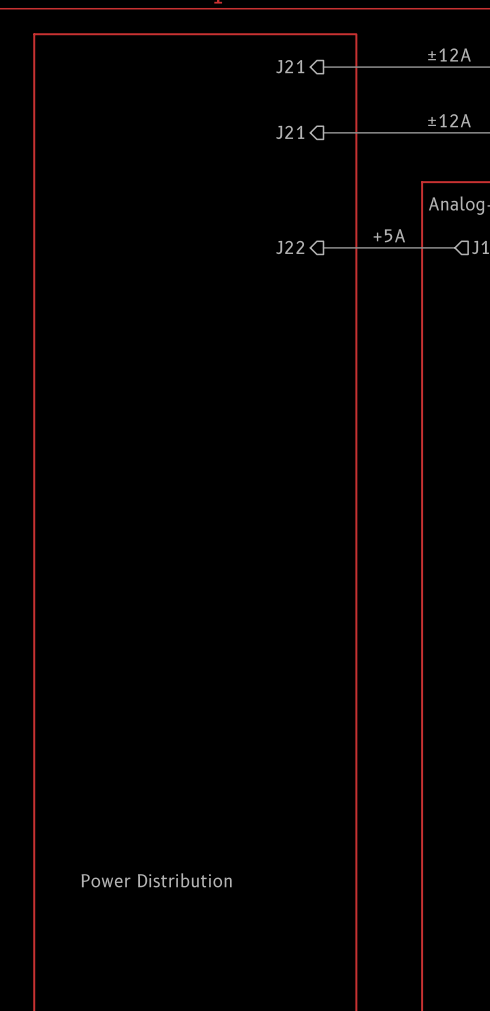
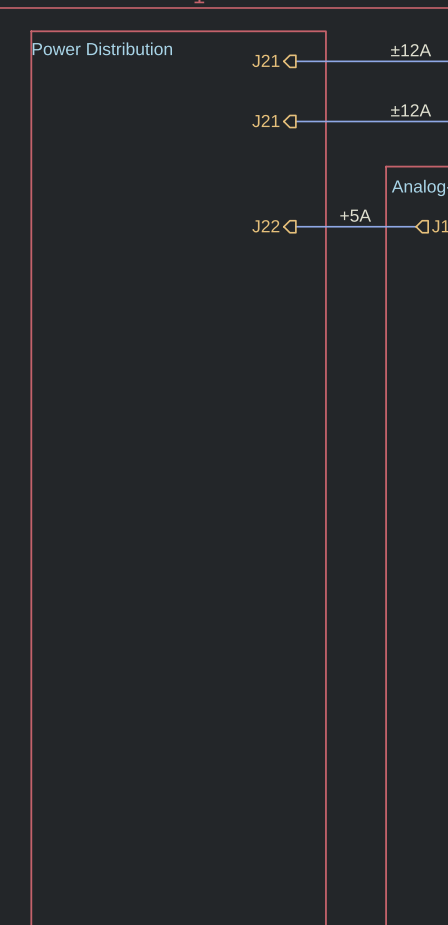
sheet Power Distribution name position: Power Distribution (156, 880) -> Power Distribution (102, 48)

